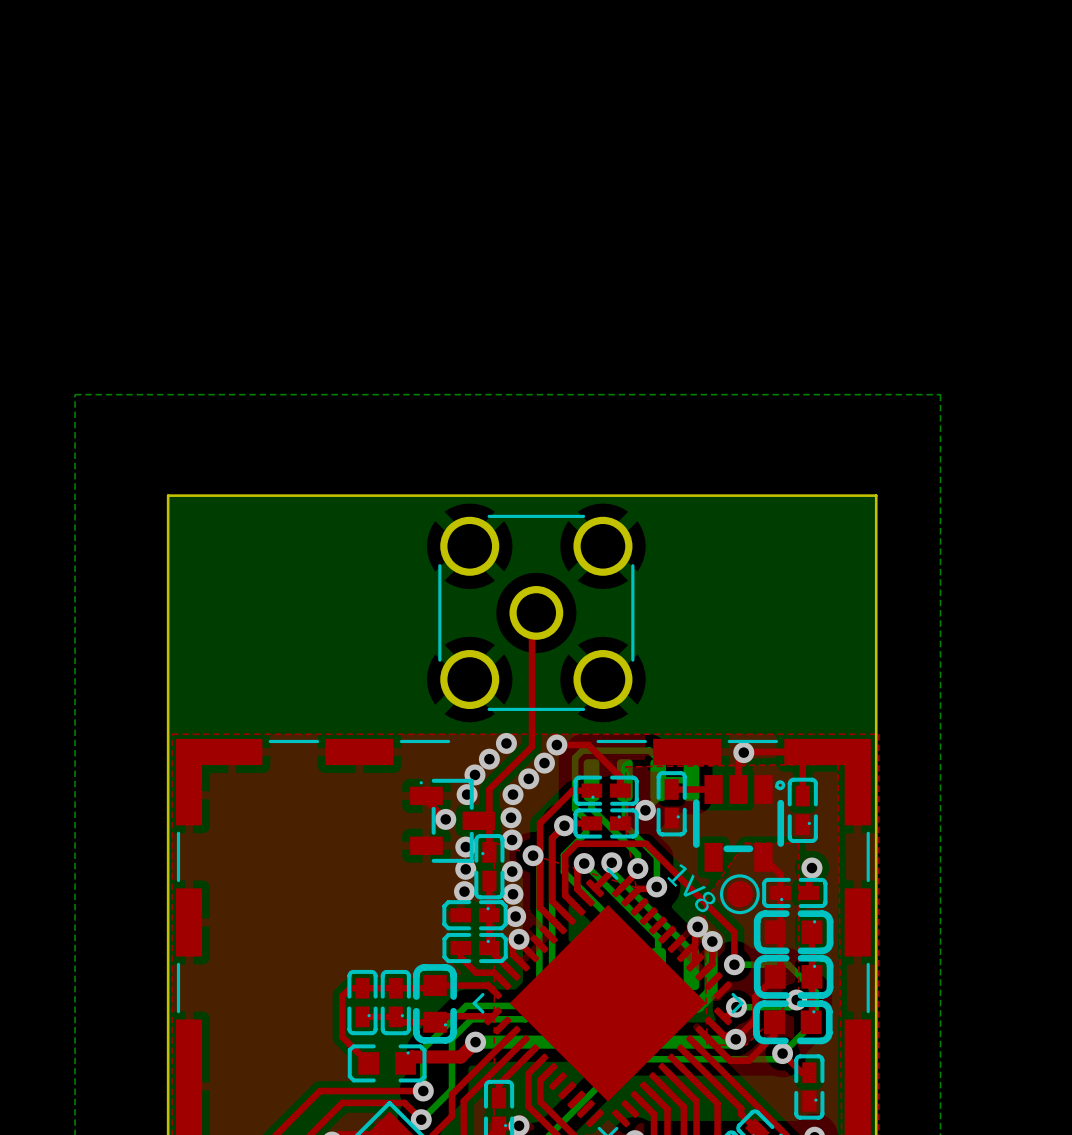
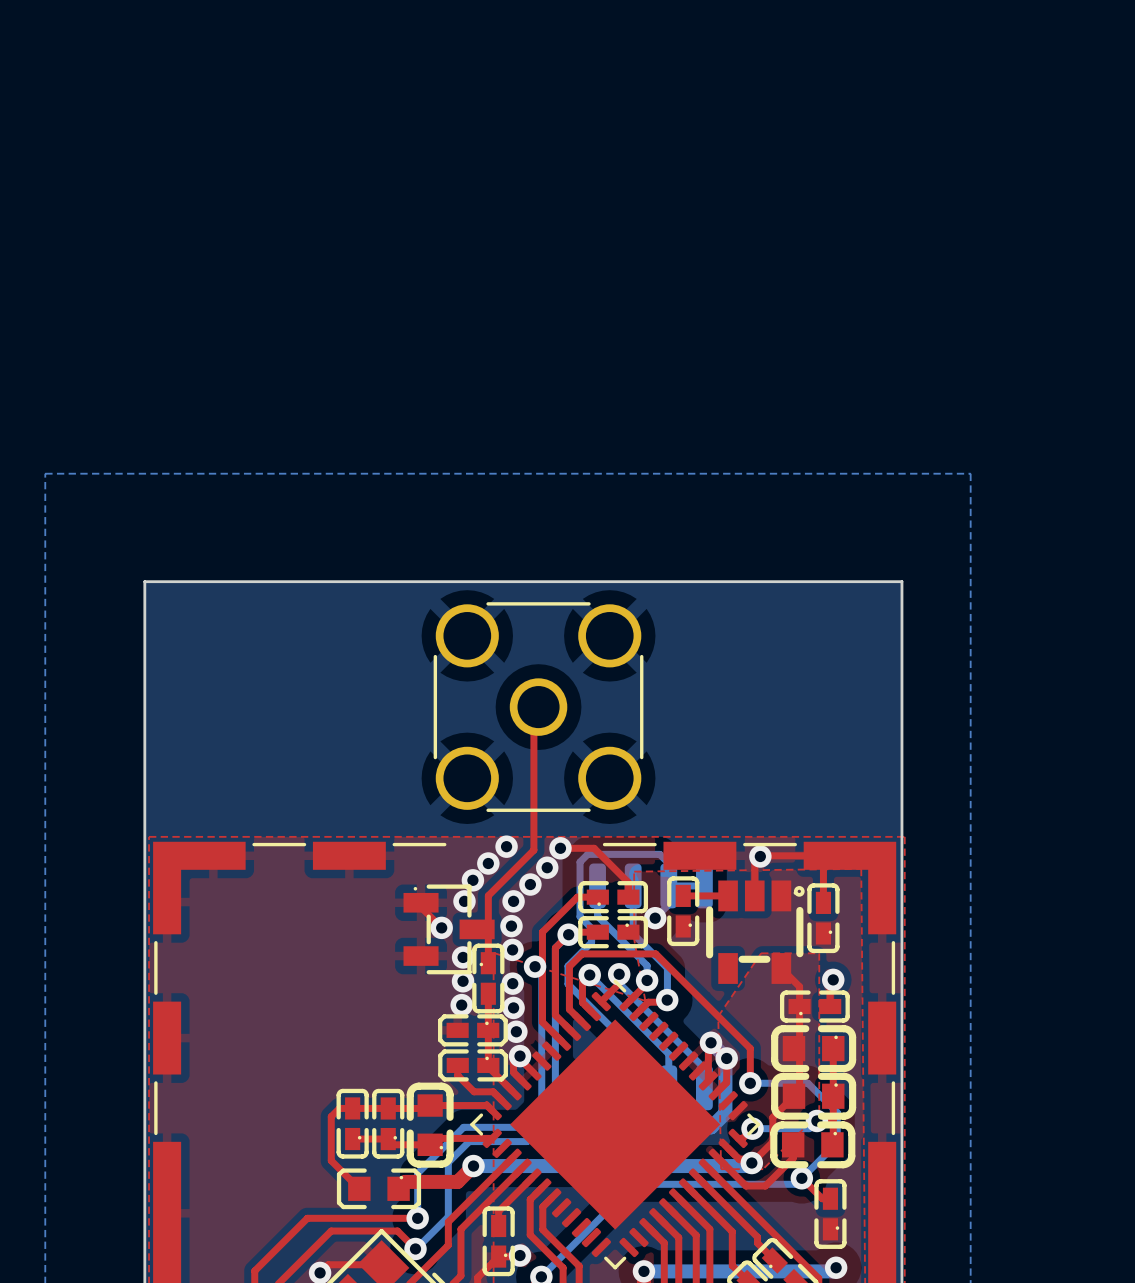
part: 1V8 (739, 894) -> none

